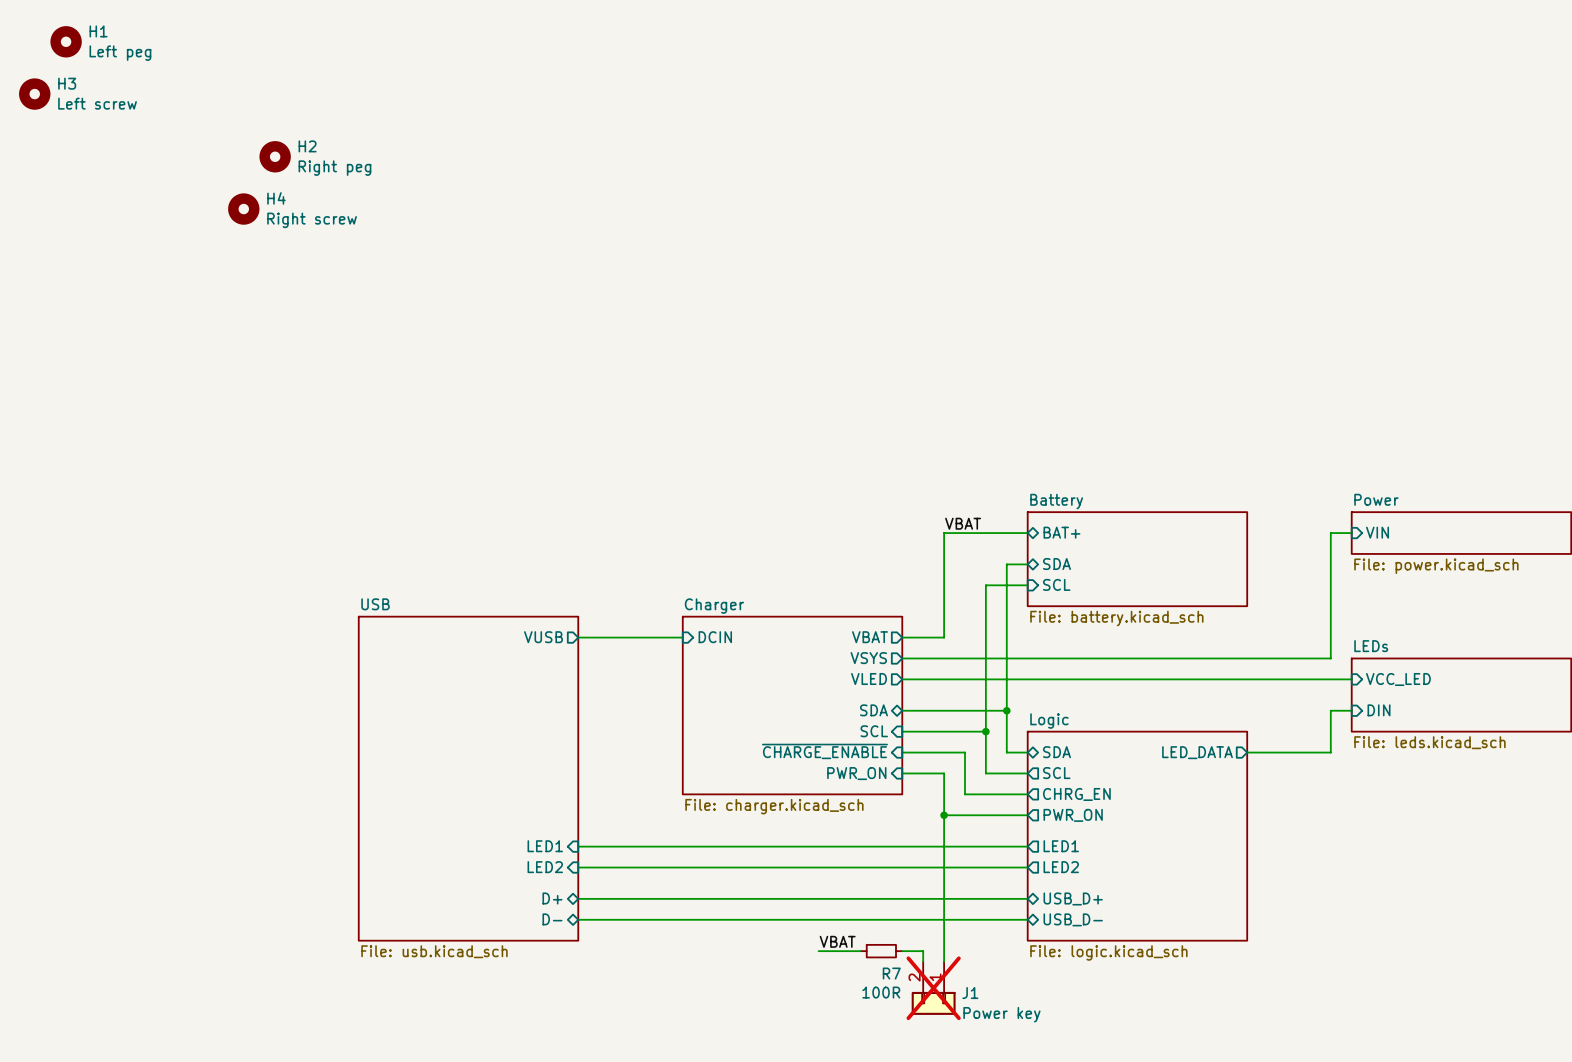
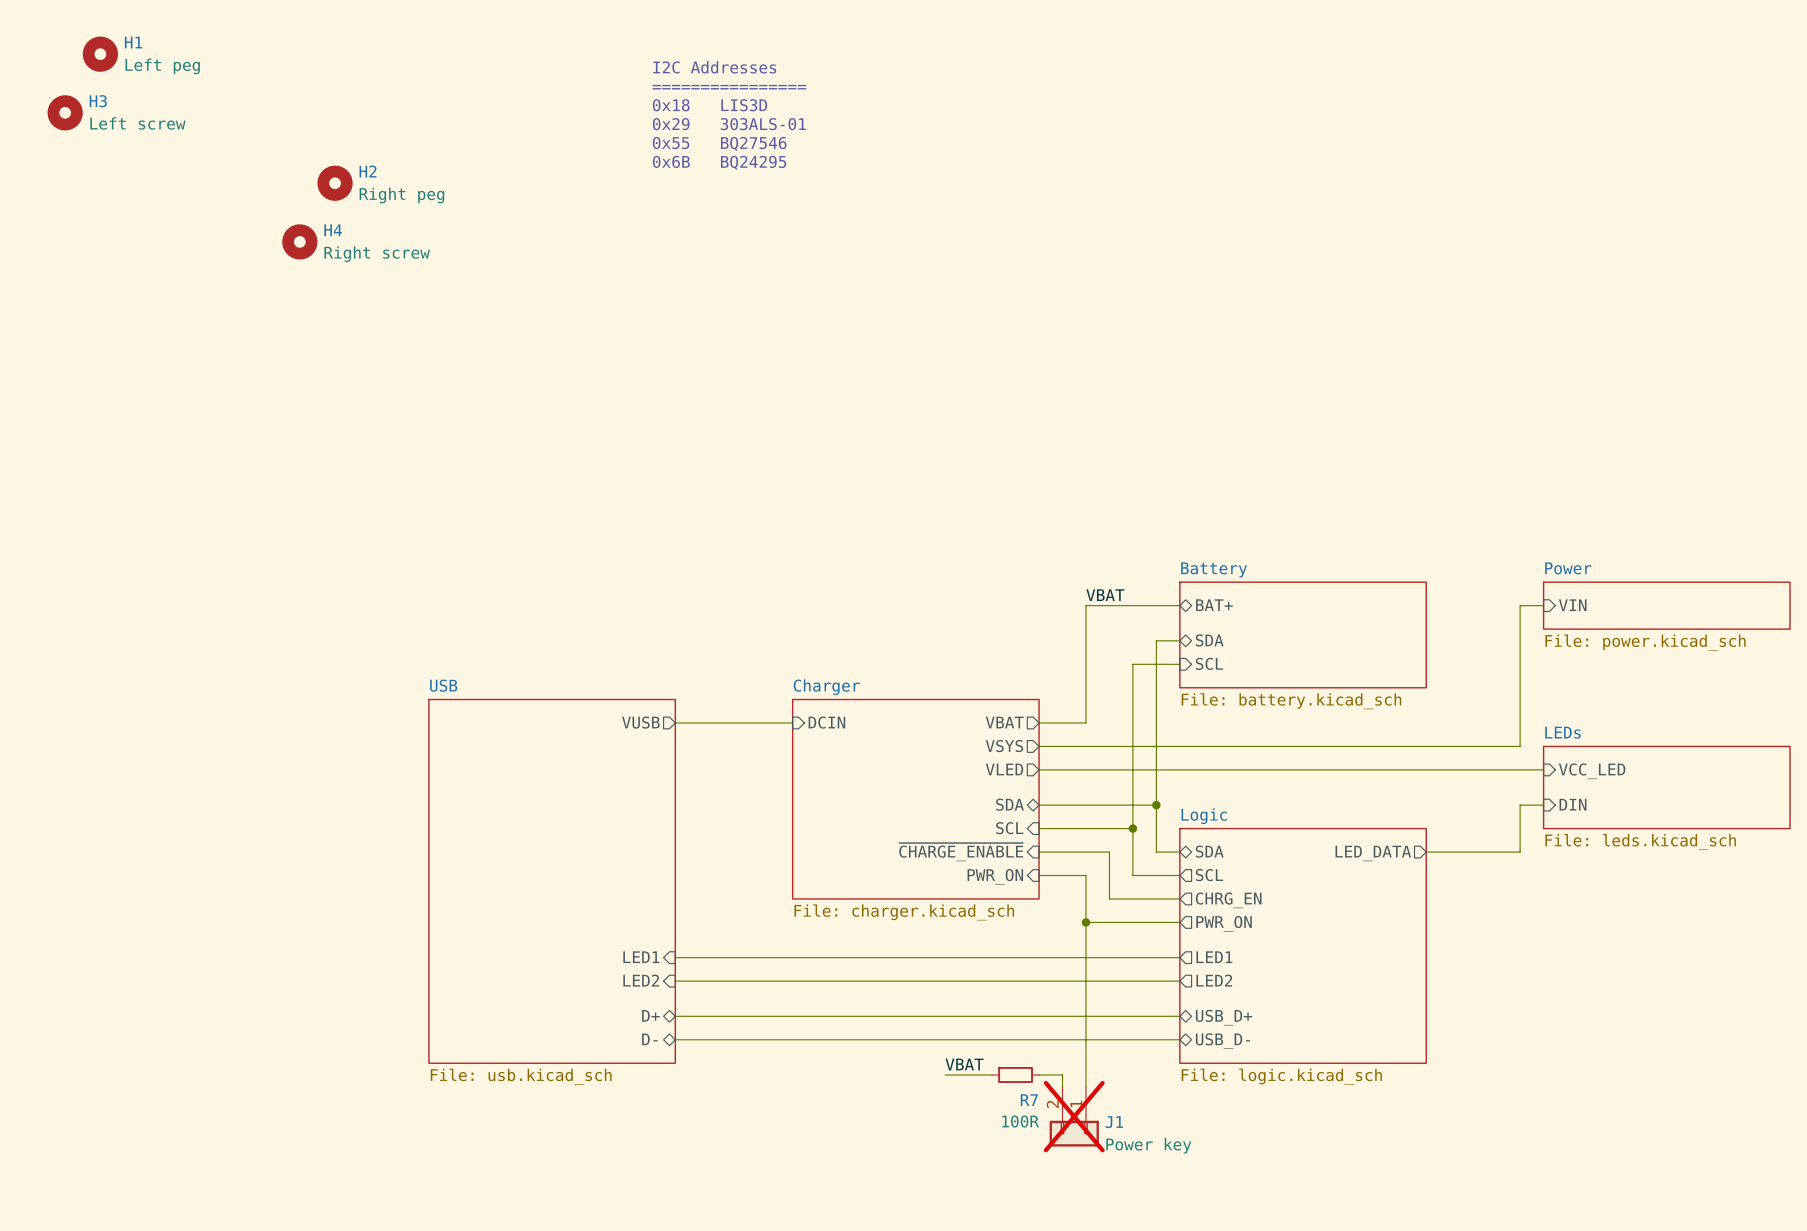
text: none -> I2C Addresses (714, 67)
text: none -> ================ (729, 87)
text: none -> 0x18 LIS3D (710, 105)
text: none -> 0x29 303ALS-01 (729, 124)
text: none -> 0x55 BQ27546 (719, 143)
text: none -> 0x6B BQ24295 (719, 162)

